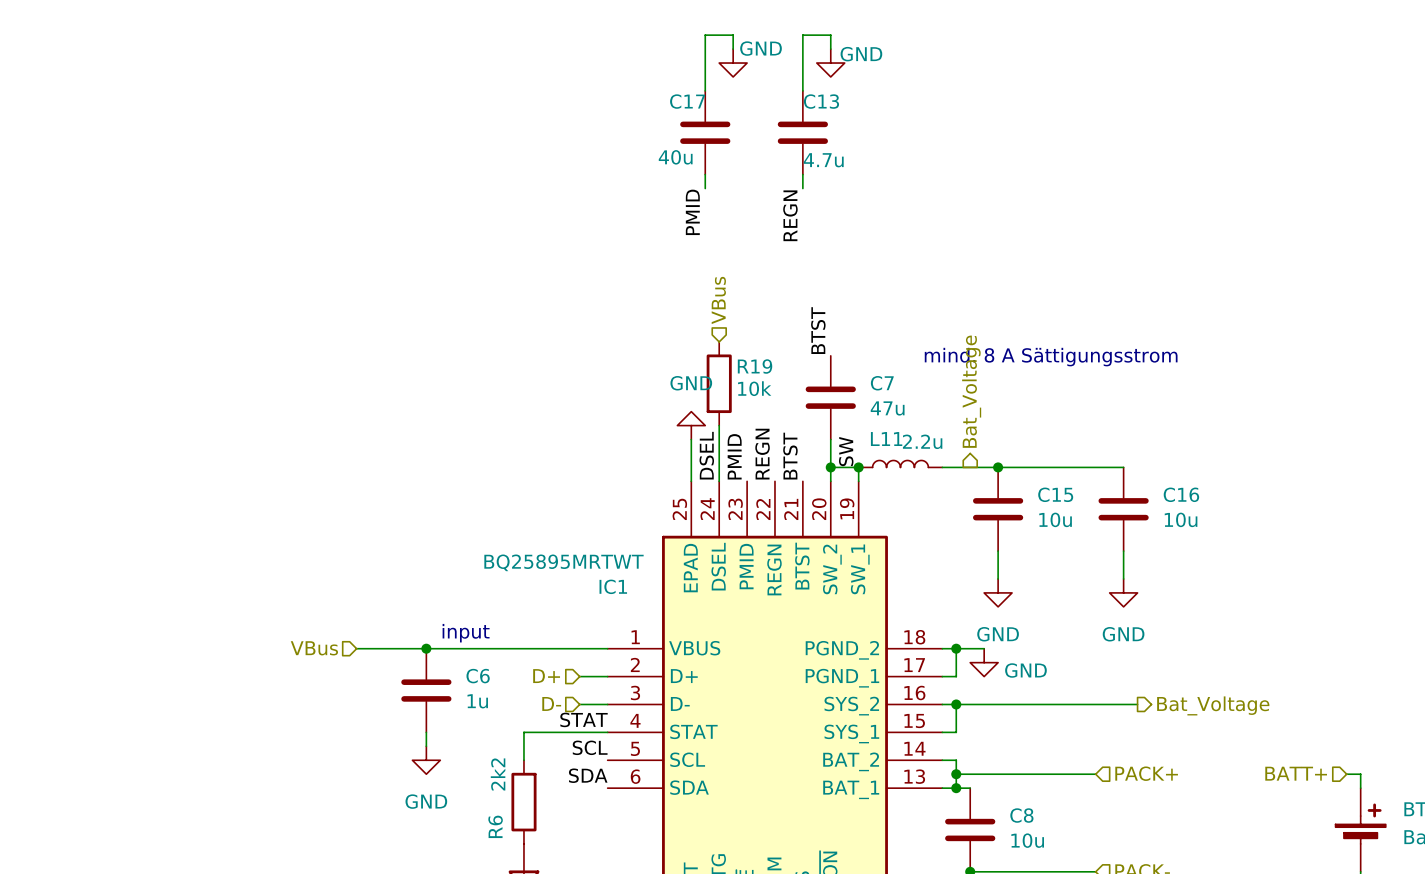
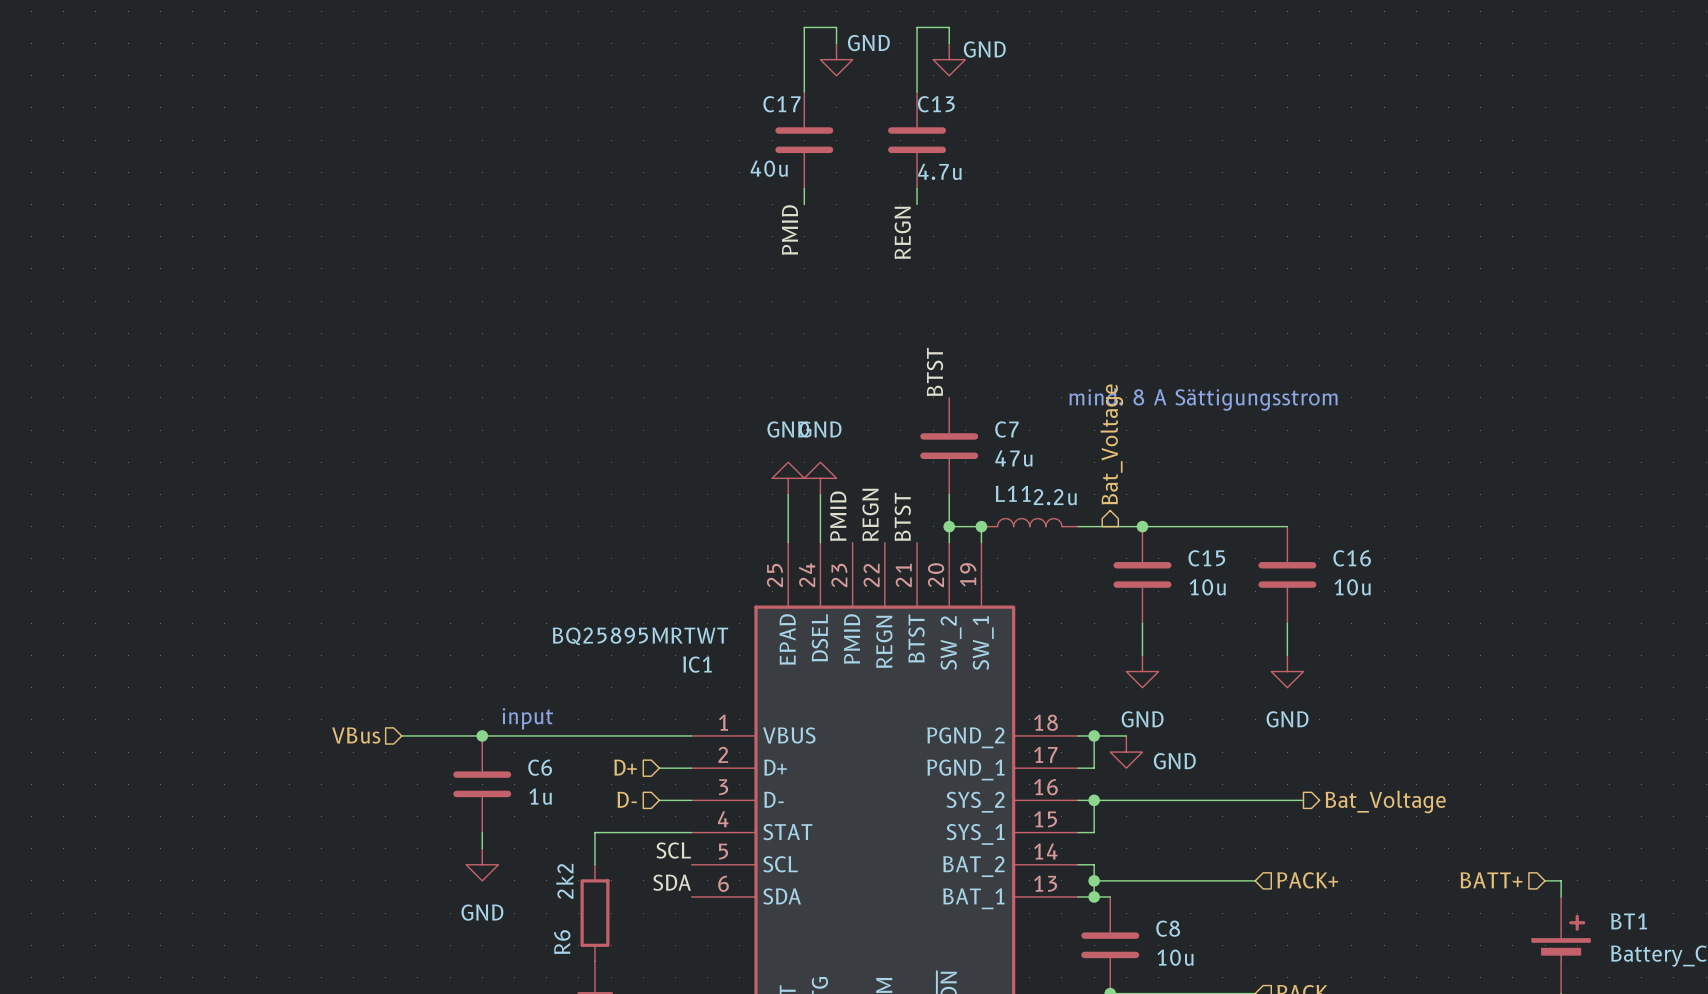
hierarchical label: VBus (718, 300) -> none
R19: 10k (719, 383) -> none
power symbol: none -> GND (820, 478)
label: SW (846, 451) -> none
label: DSEL (706, 455) -> none
label: STAT (584, 719) -> none

